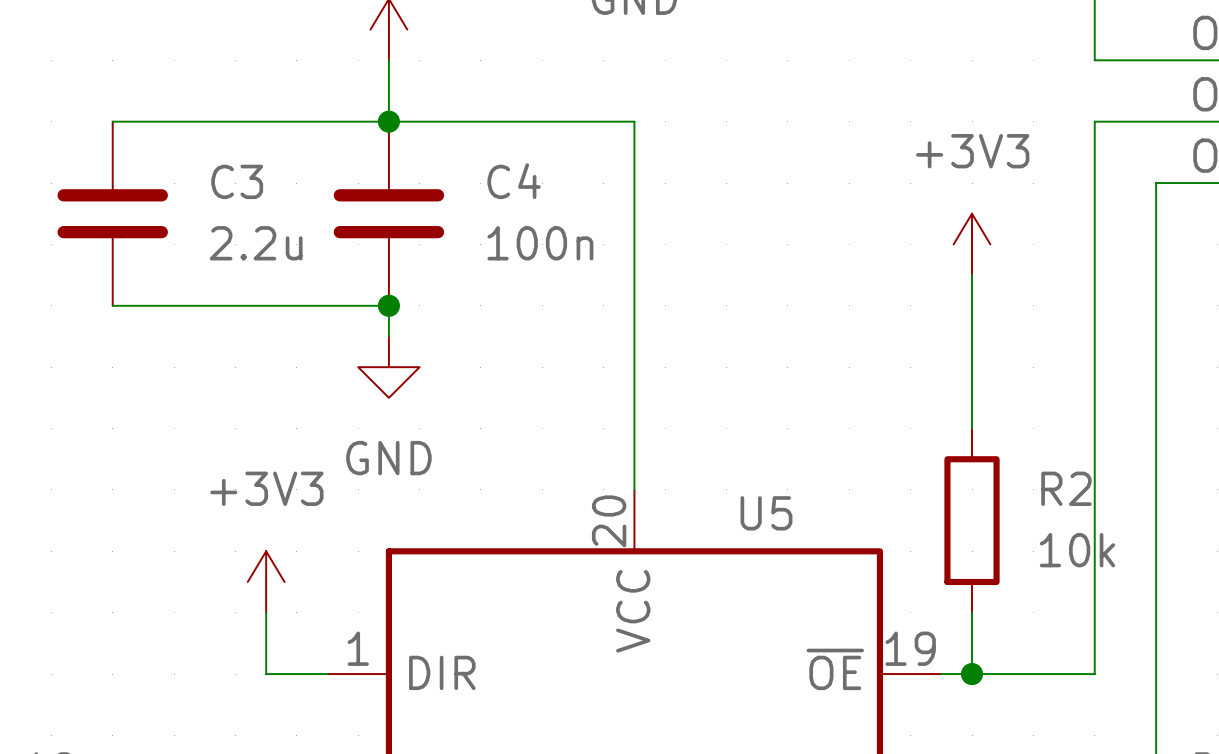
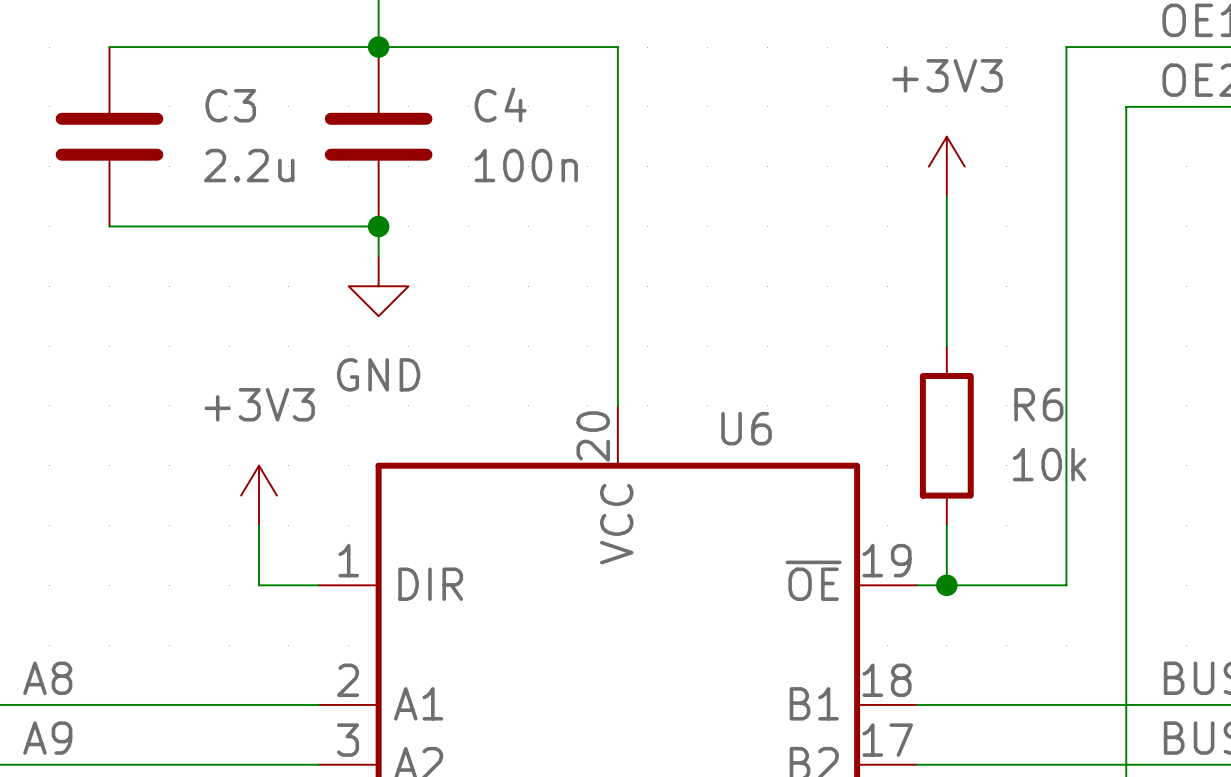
R2 name: R2 (1066, 488) -> R6 (1038, 404)
U5 name: U5 (766, 513) -> U6 (746, 428)

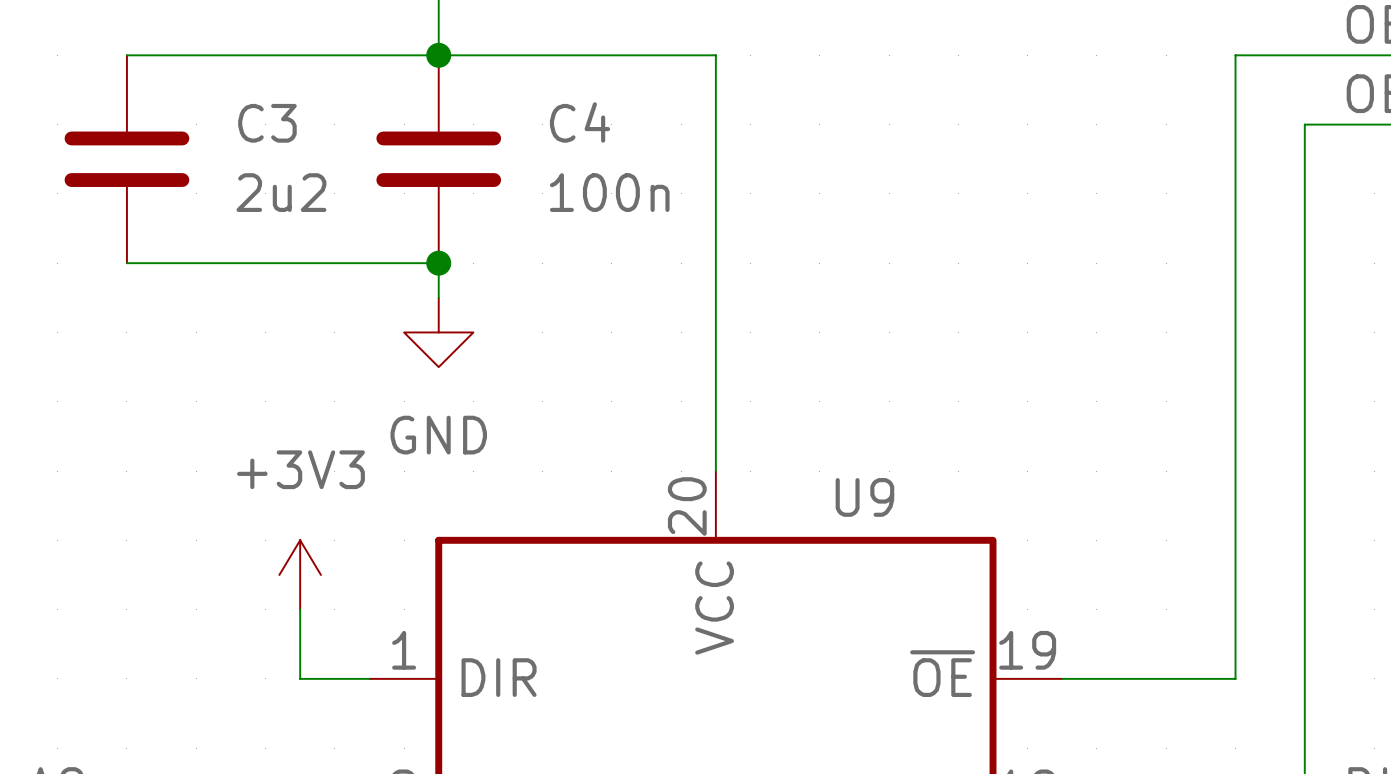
C3 value: 2.2u (249, 165) -> 2u2 (281, 192)
power symbol: +3V3 (946, 166) -> none
wire: (946, 196) (946, 346) -> none
U6 name: U6 (746, 428) -> U9 (864, 497)
R6: 10k (946, 435) -> none
wire: (946, 525) (946, 585) -> none
junction: (946, 585) -> none

